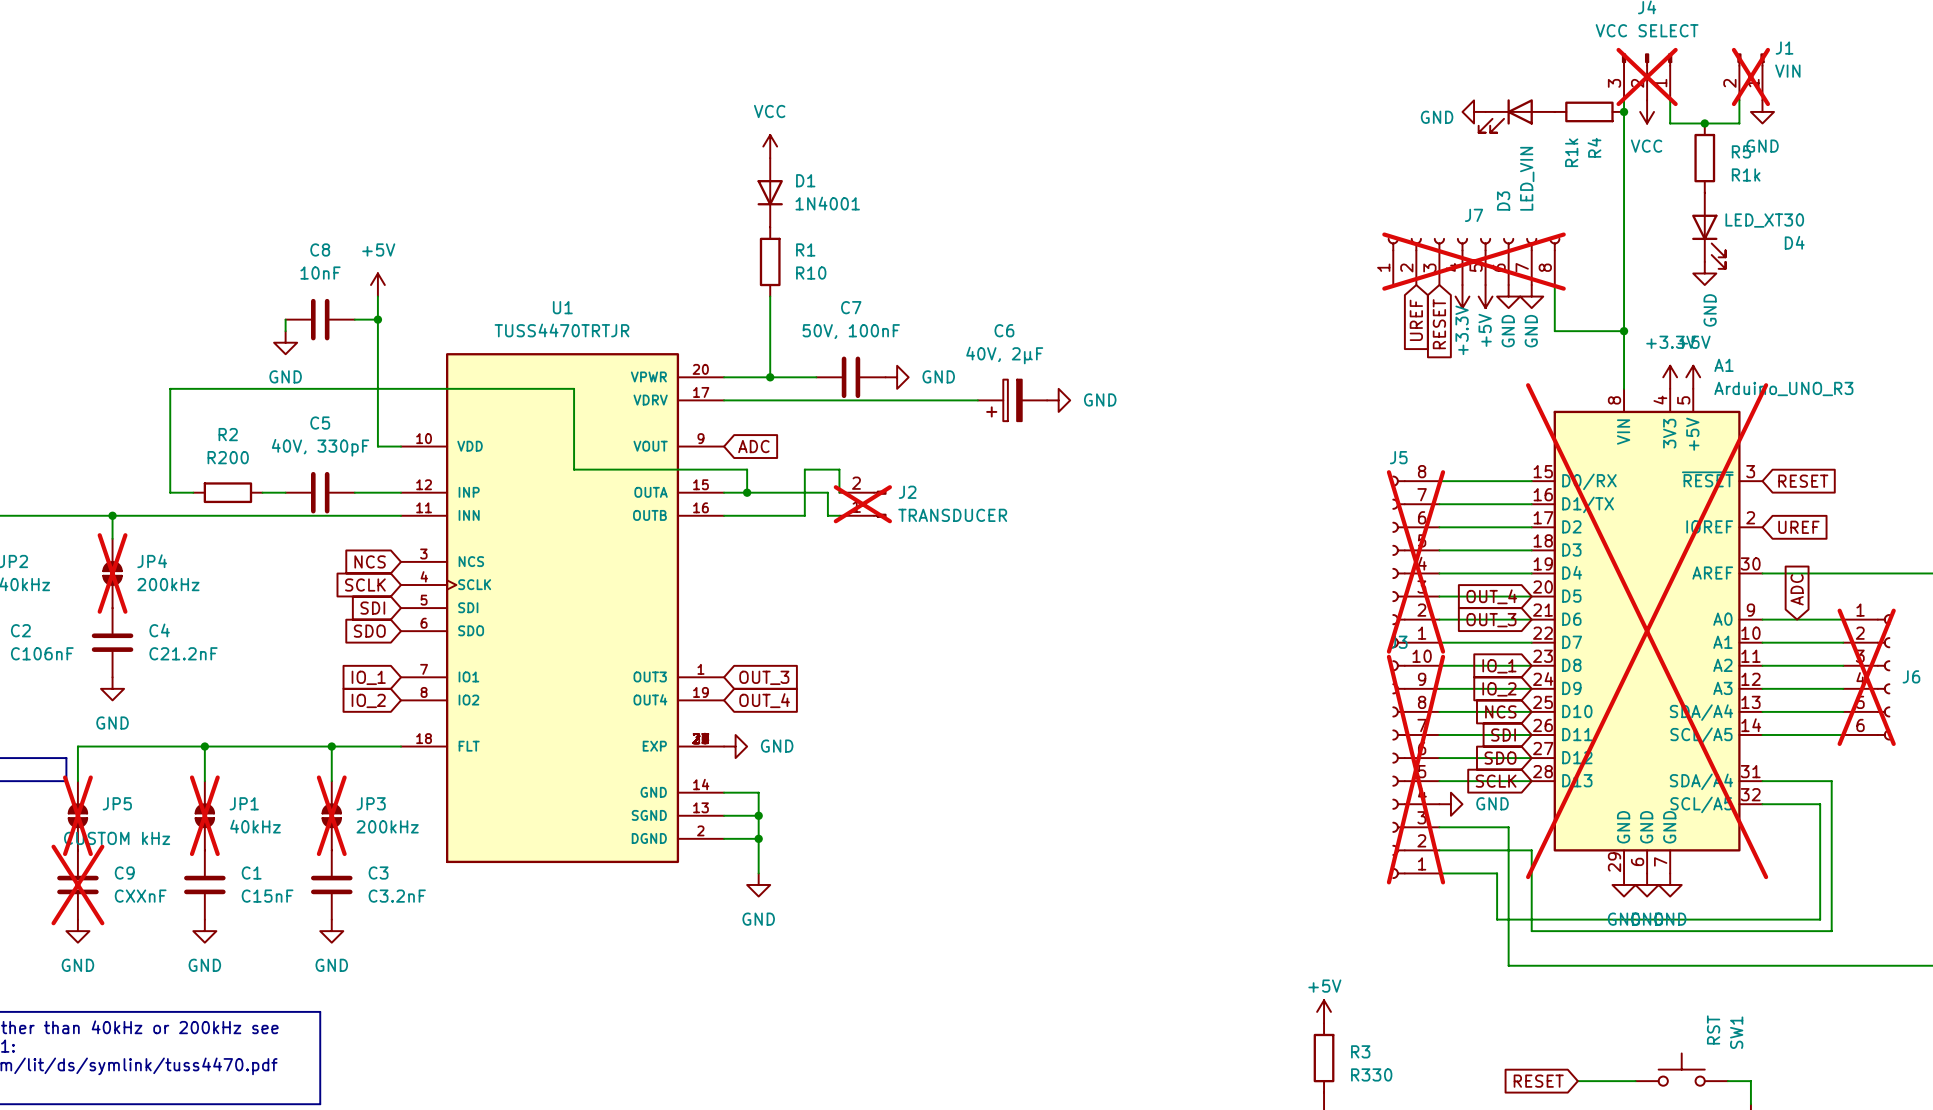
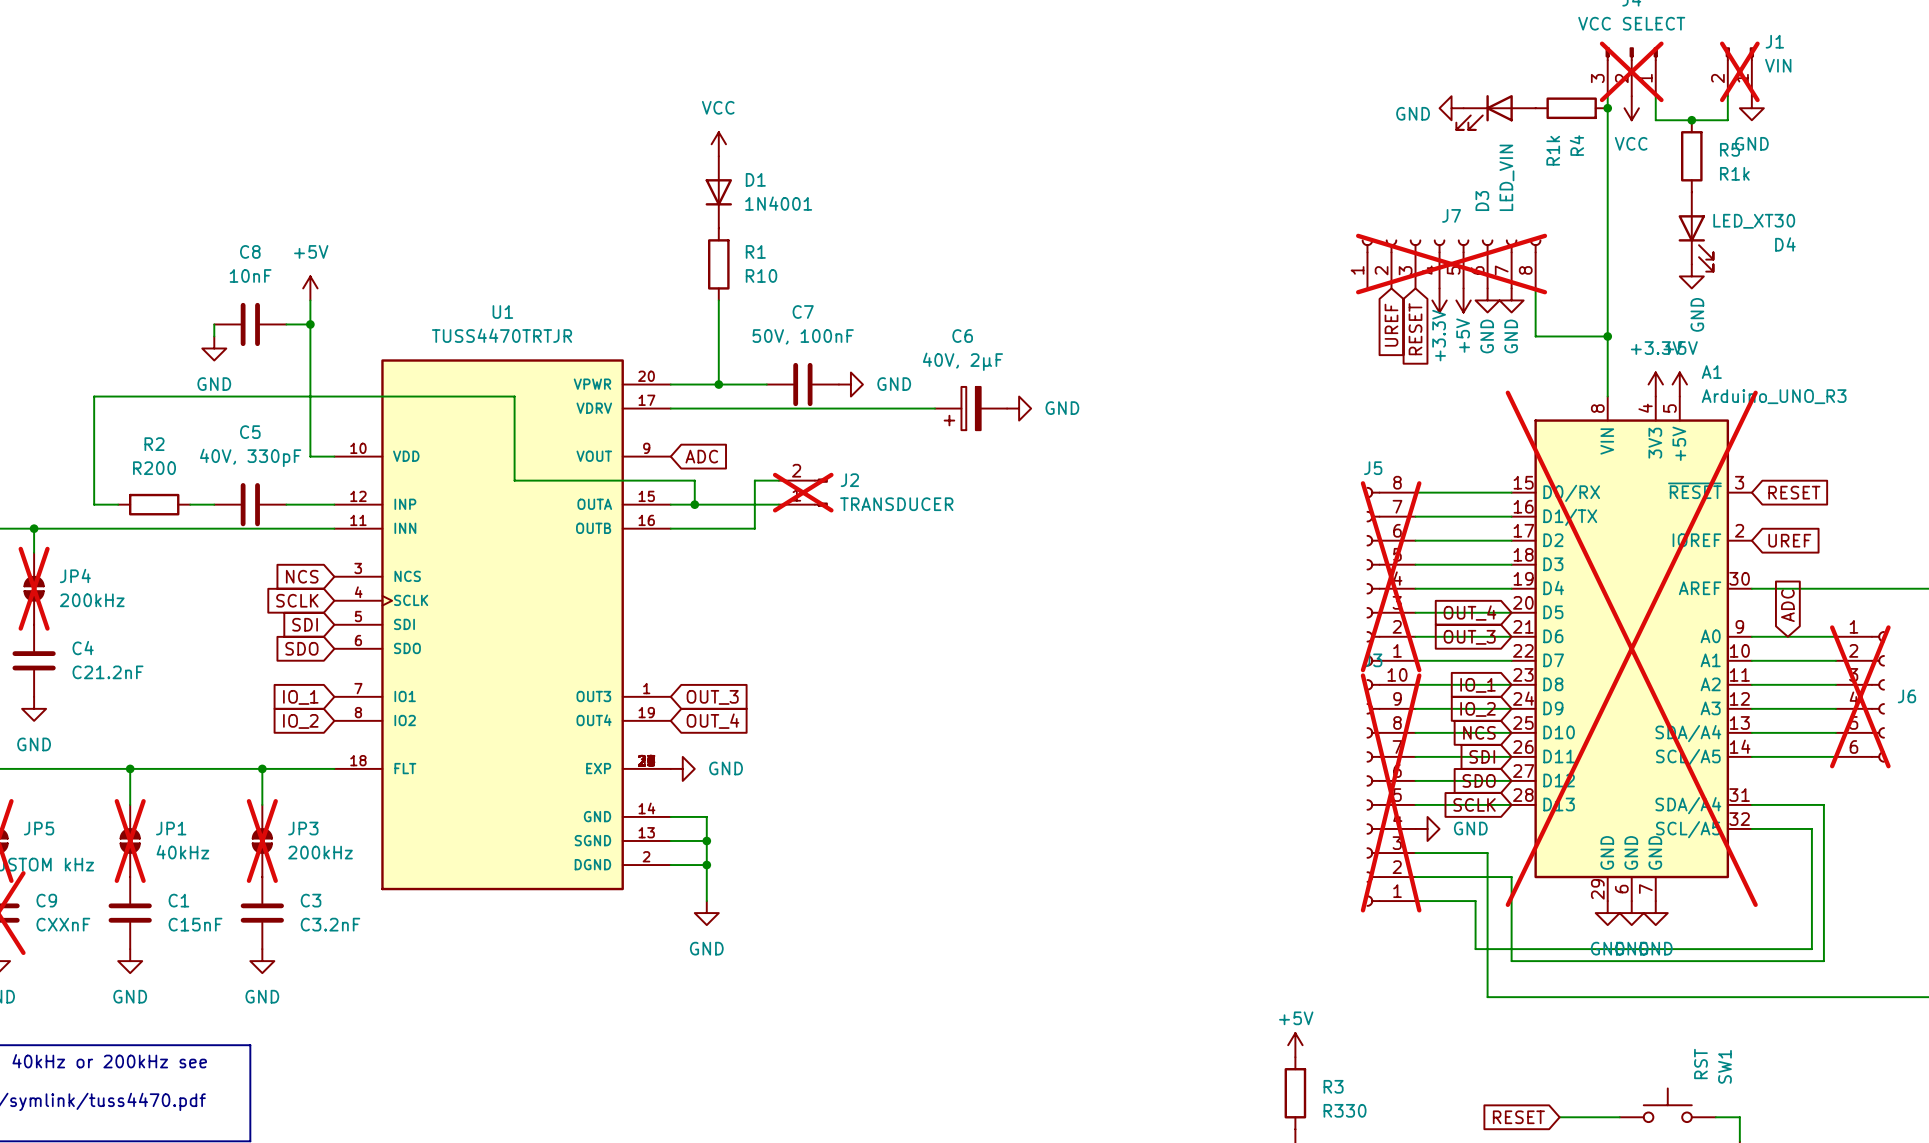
wire: (827, 492) (827, 515) (839, 515) -> none
J2 position: (862, 504) -> (803, 492)

